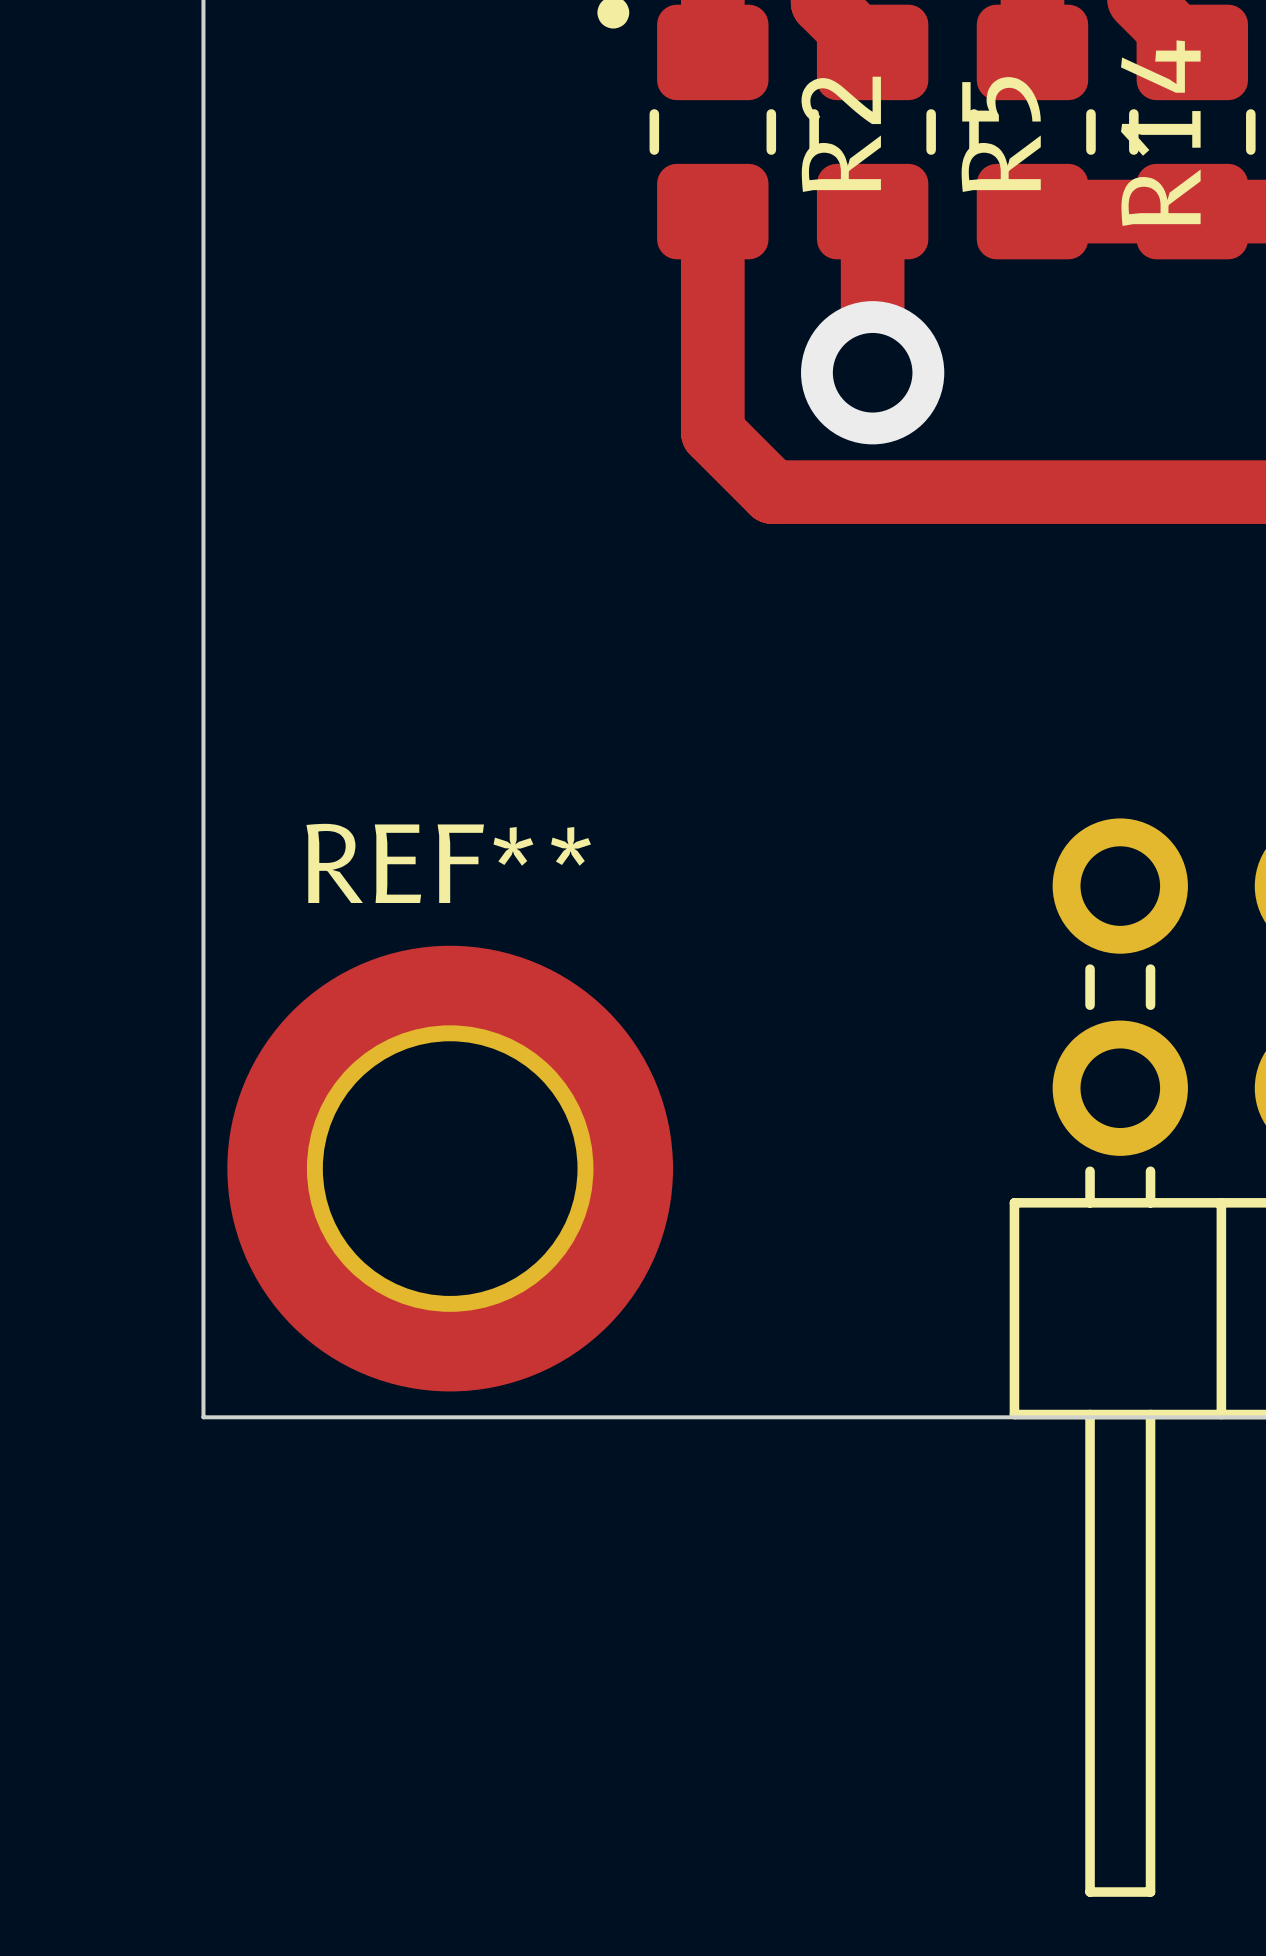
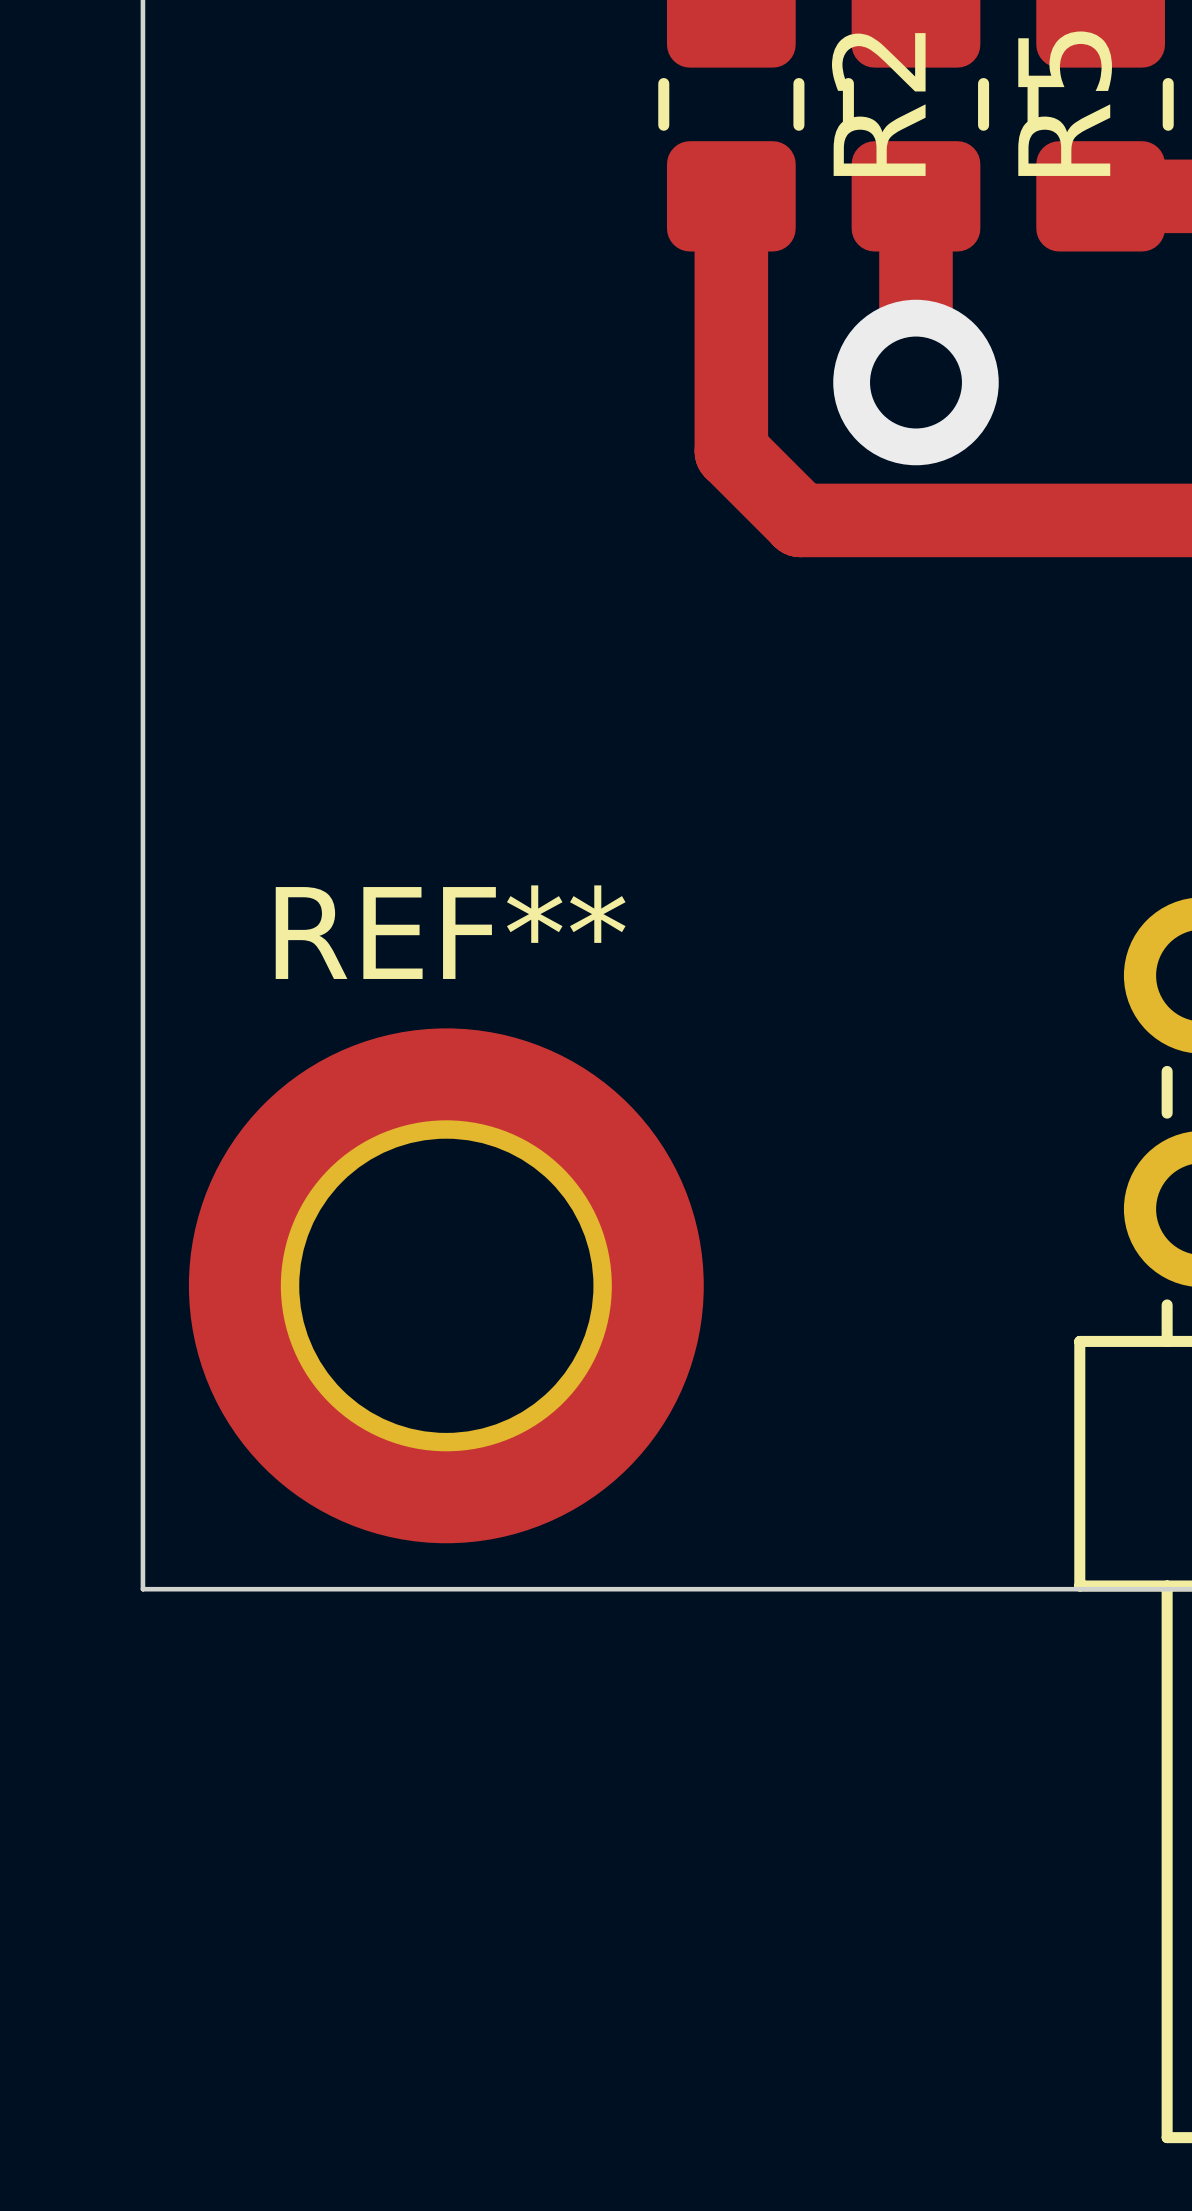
REF** position: (450, 1168) -> (446, 1285)

